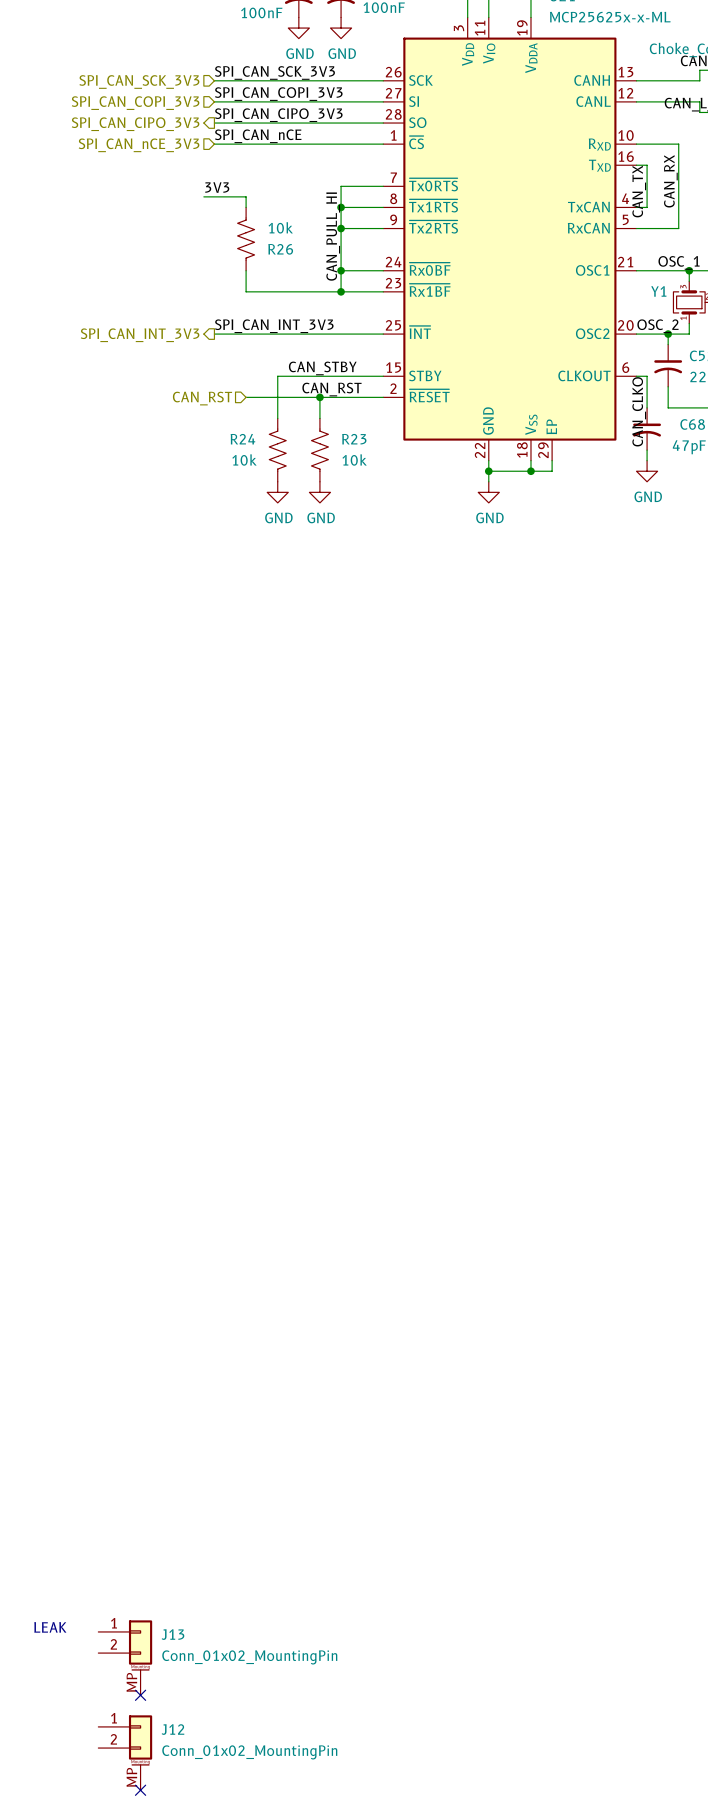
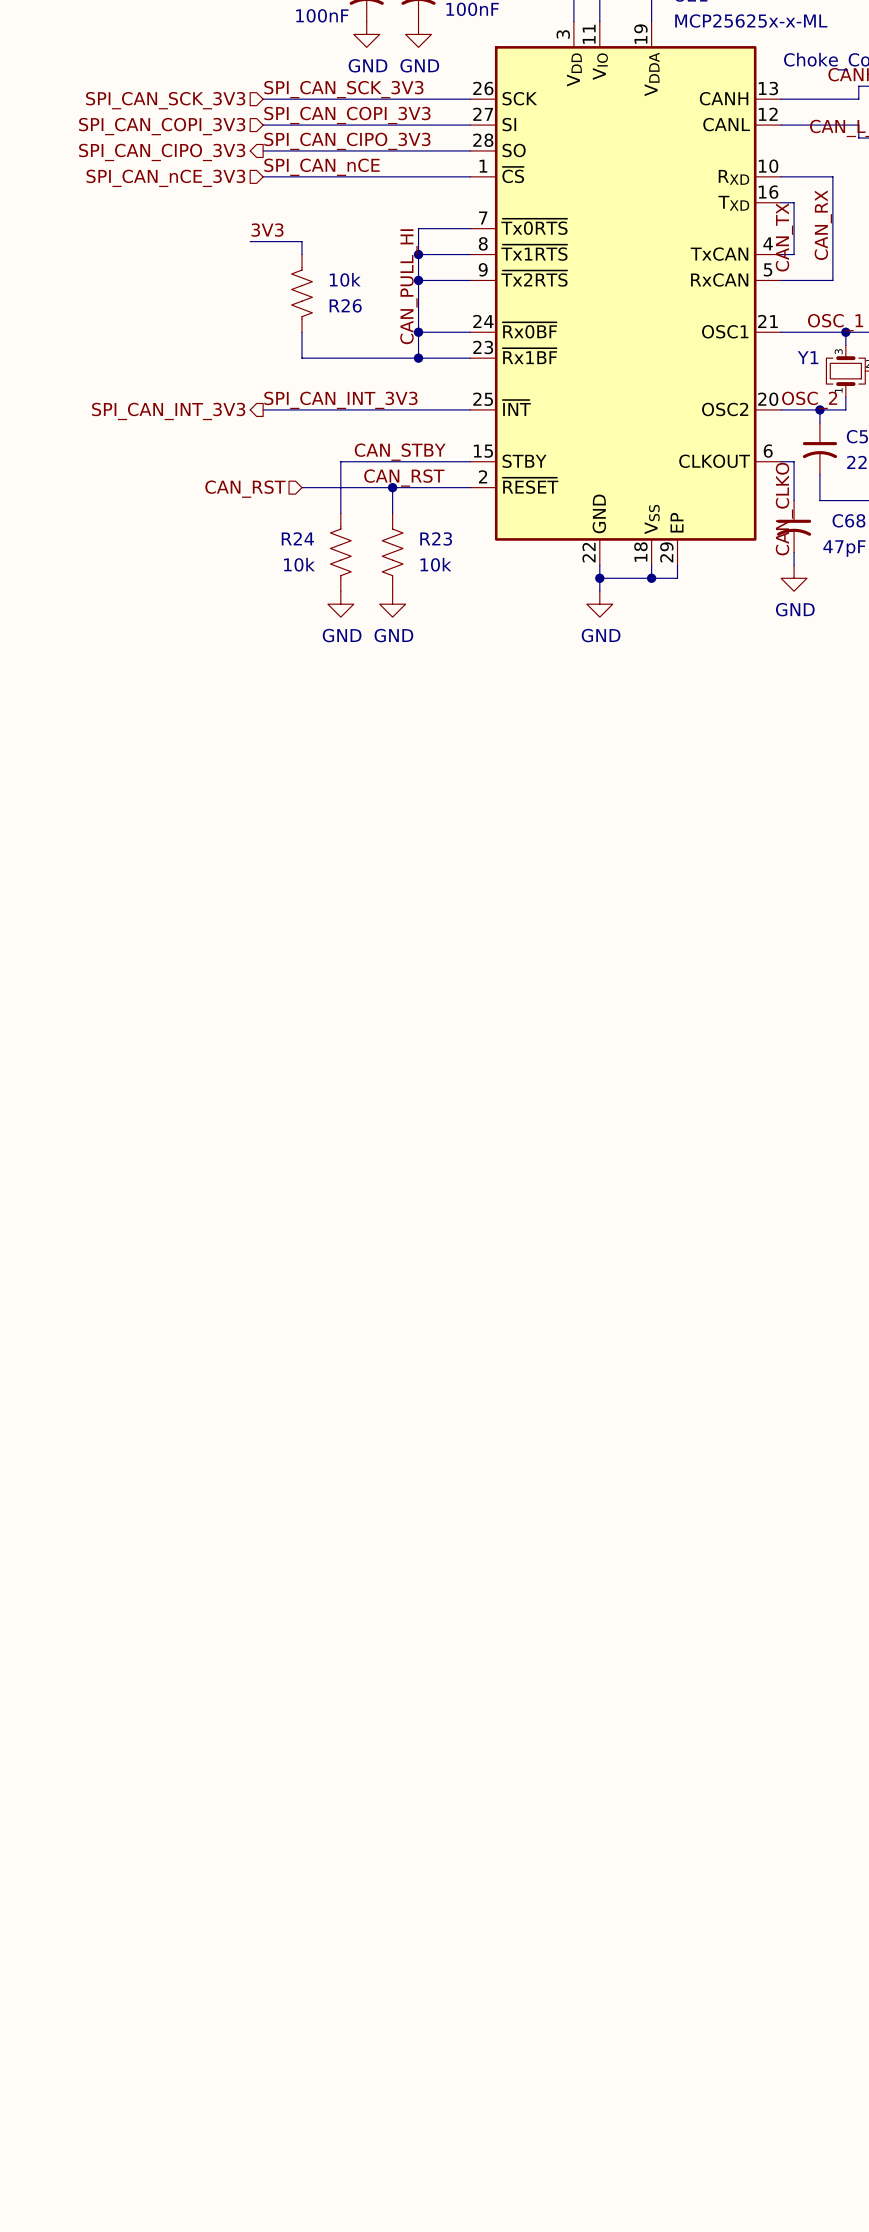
text: LEAK (50, 1627) -> none
J13: Conn_01x02_MountingPin (125, 1657) -> none
no-connect mark: (140, 1695) -> none
J12: Conn_01x02_MountingPin (125, 1752) -> none
no-connect mark: (140, 1790) -> none

